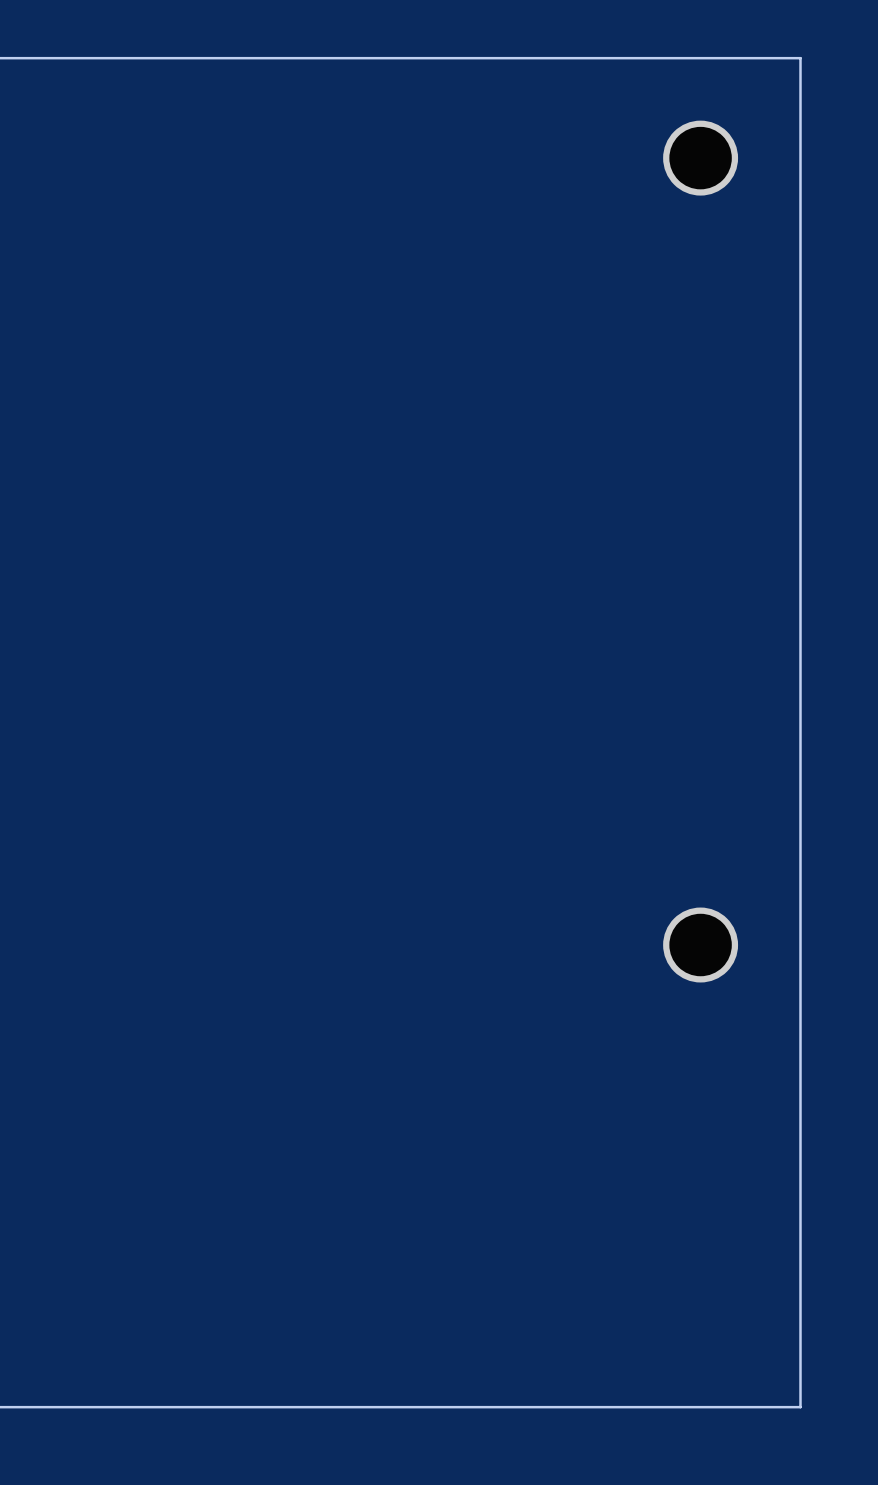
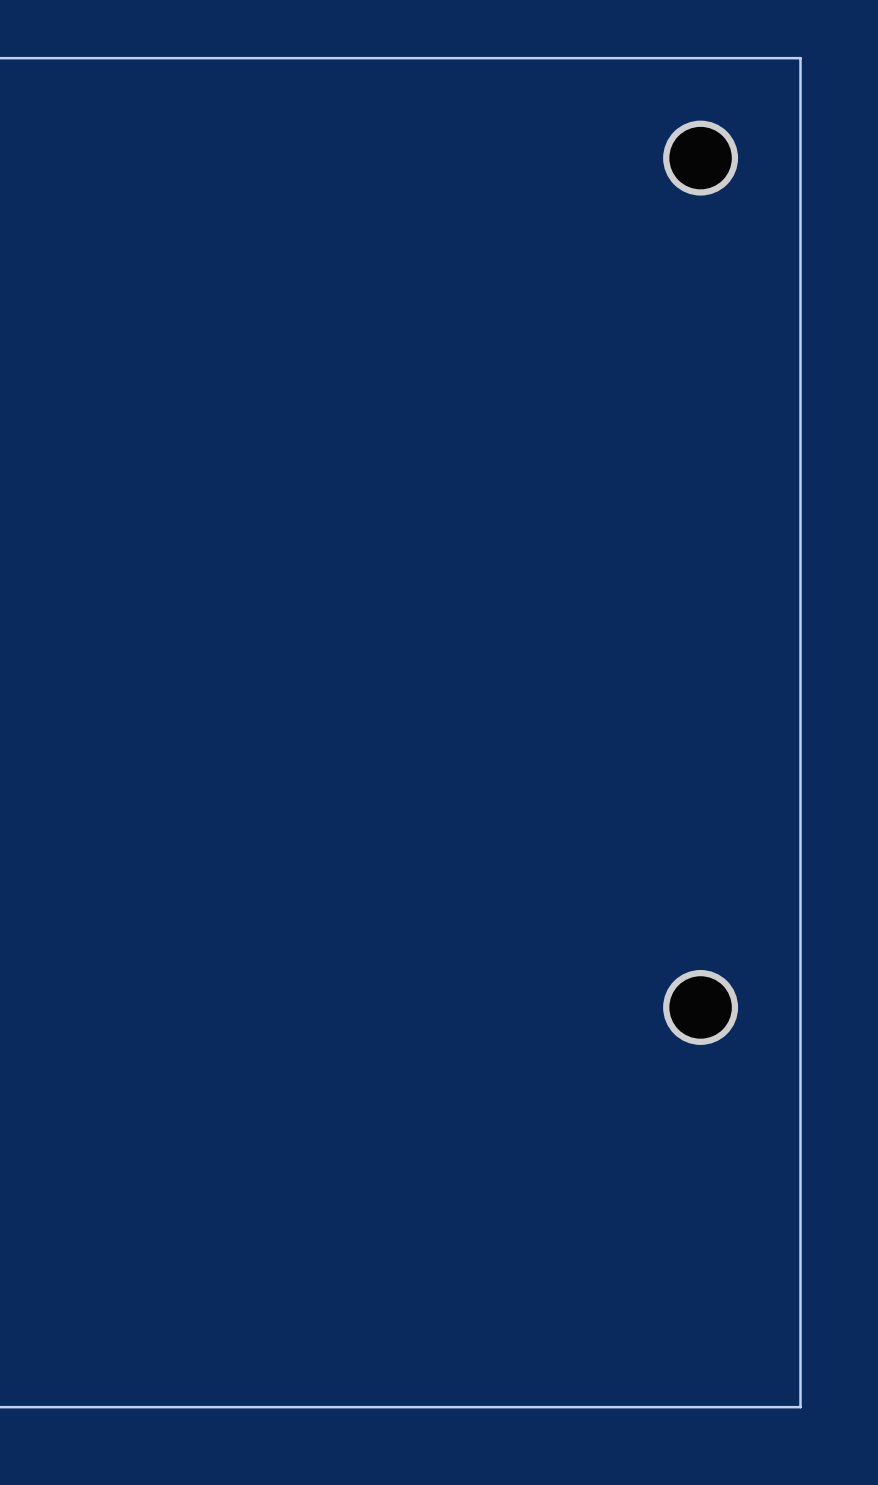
part position: (700, 945) -> (700, 1007)

